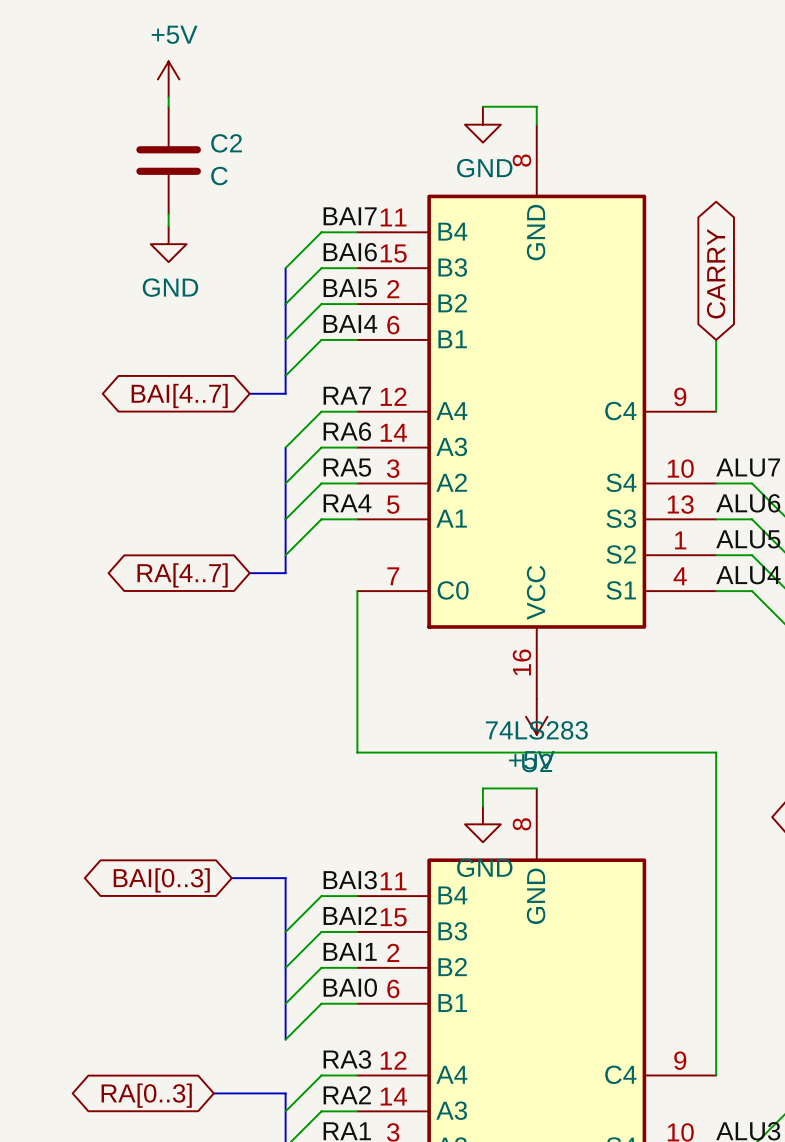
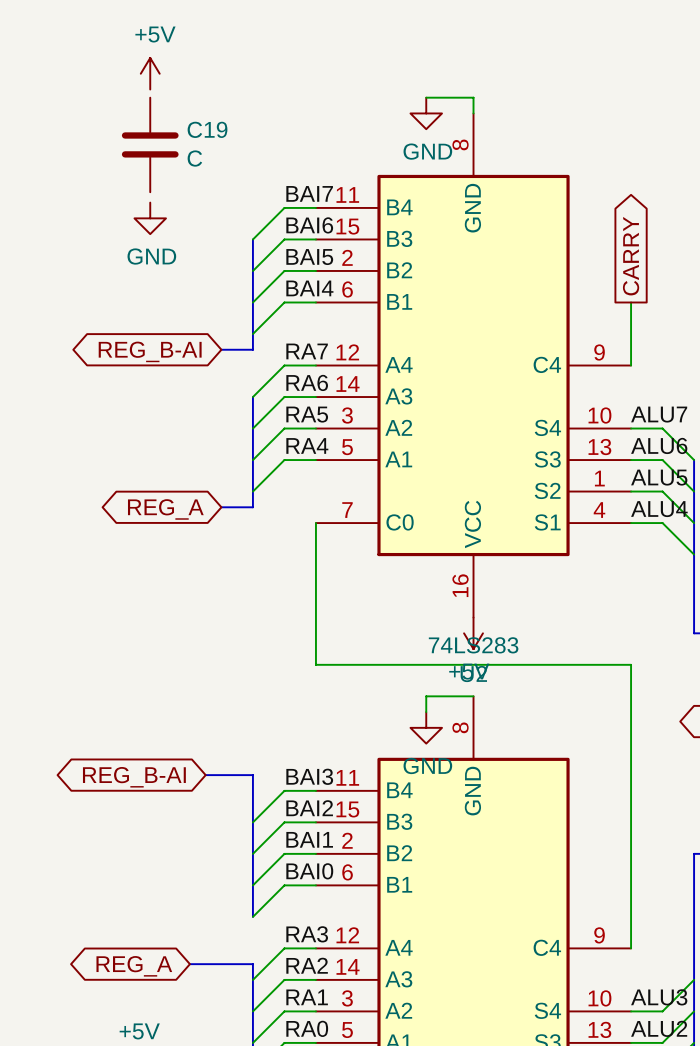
wire: (168, 97) (168, 106) -> none
C2 name: C2 (226, 143) -> C19 (207, 129)
wire: (168, 214) (168, 226) -> none
global label shape: bidirectional (716, 273) -> output (631, 256)
global label: BAI[4..7] (179, 396) -> REG_B-AI (150, 351)
global label: RA[4..7] (182, 575) -> REG_A (165, 509)
global label: BAI[0..3] (161, 880) -> REG_B-AI (134, 777)
global label: RA[0..3] (146, 1095) -> REG_A (134, 966)

